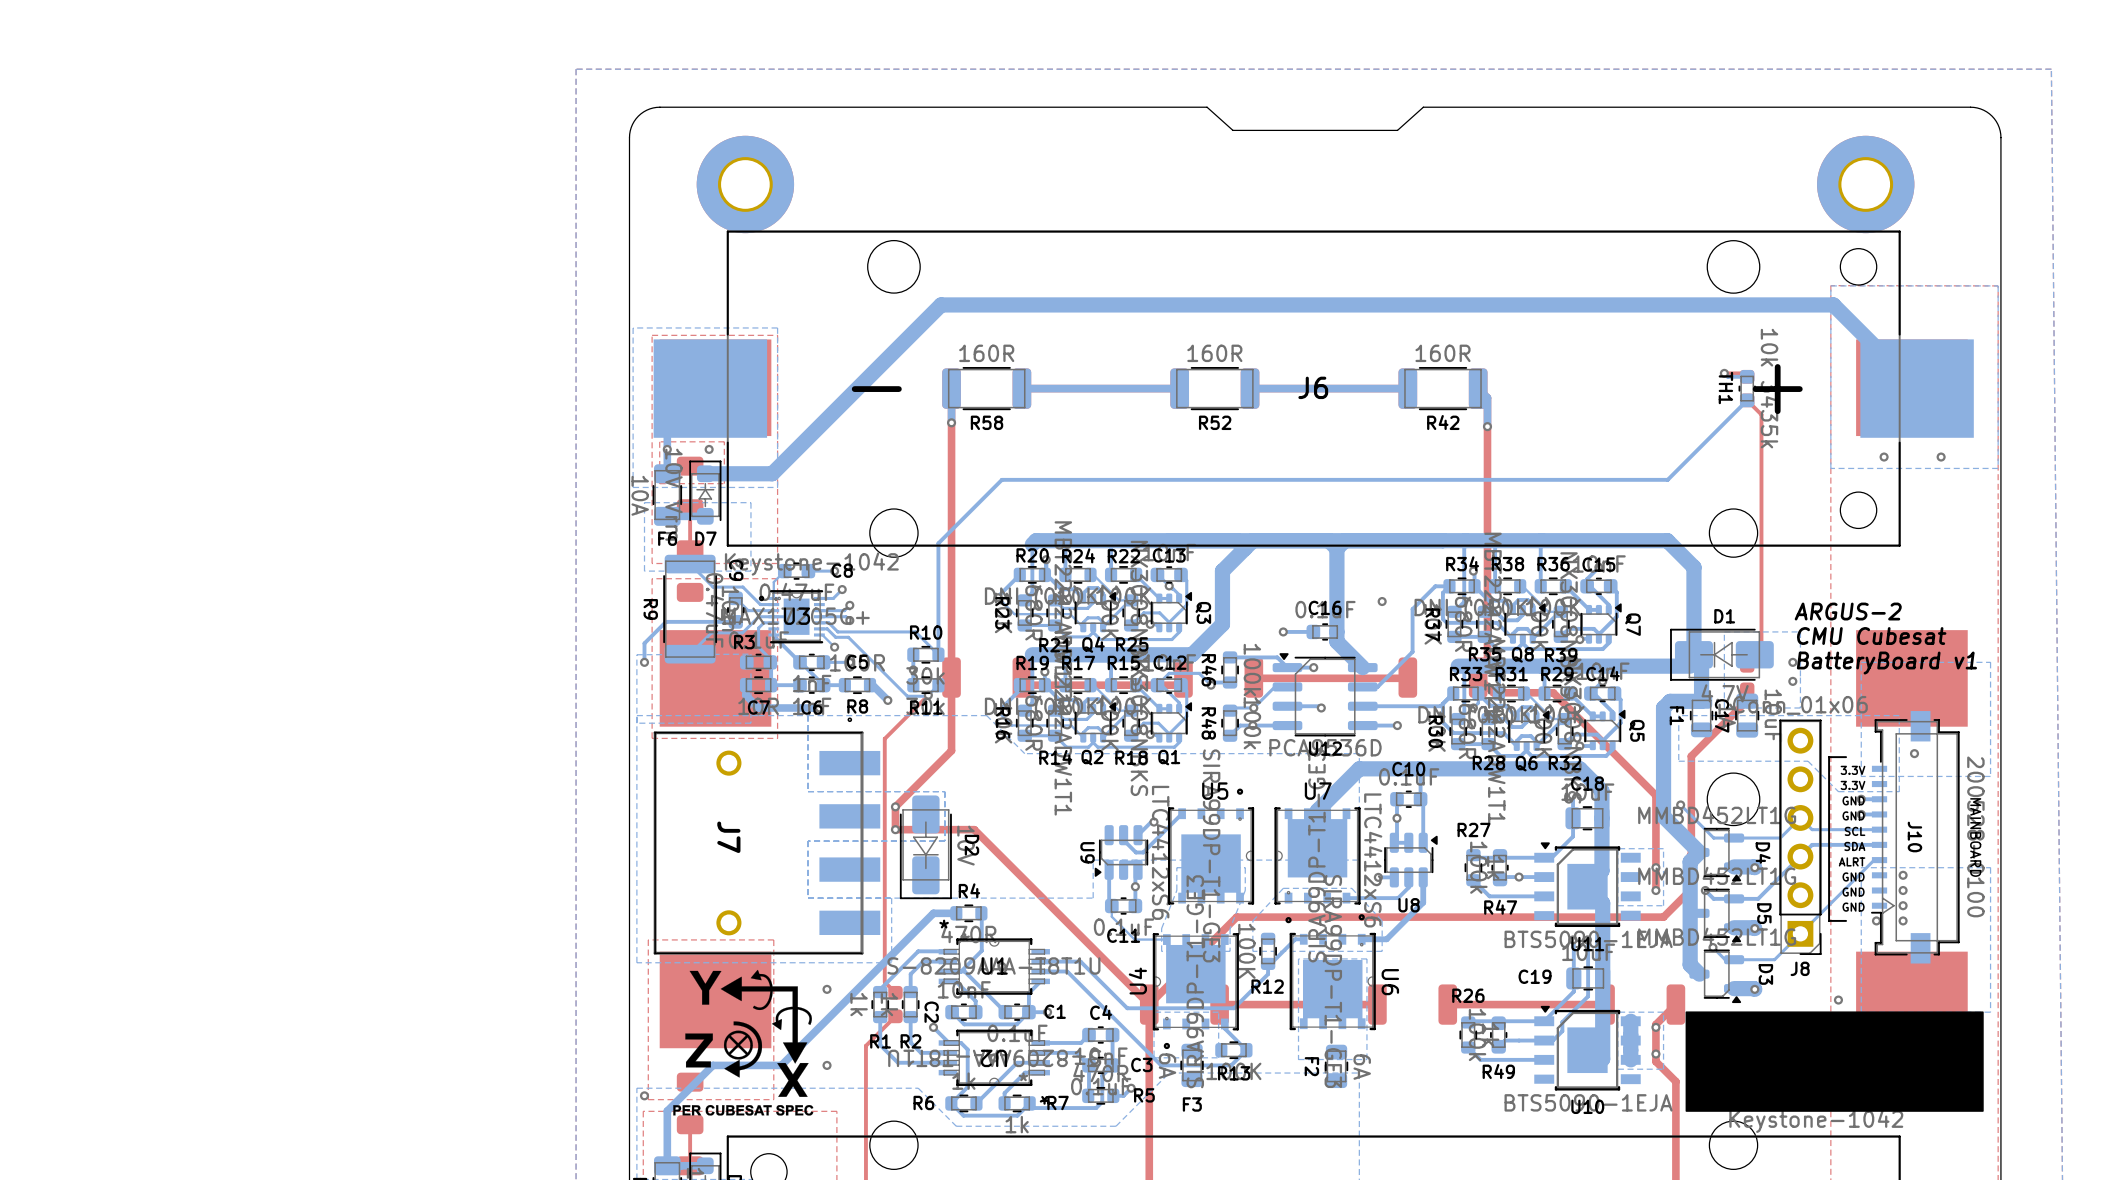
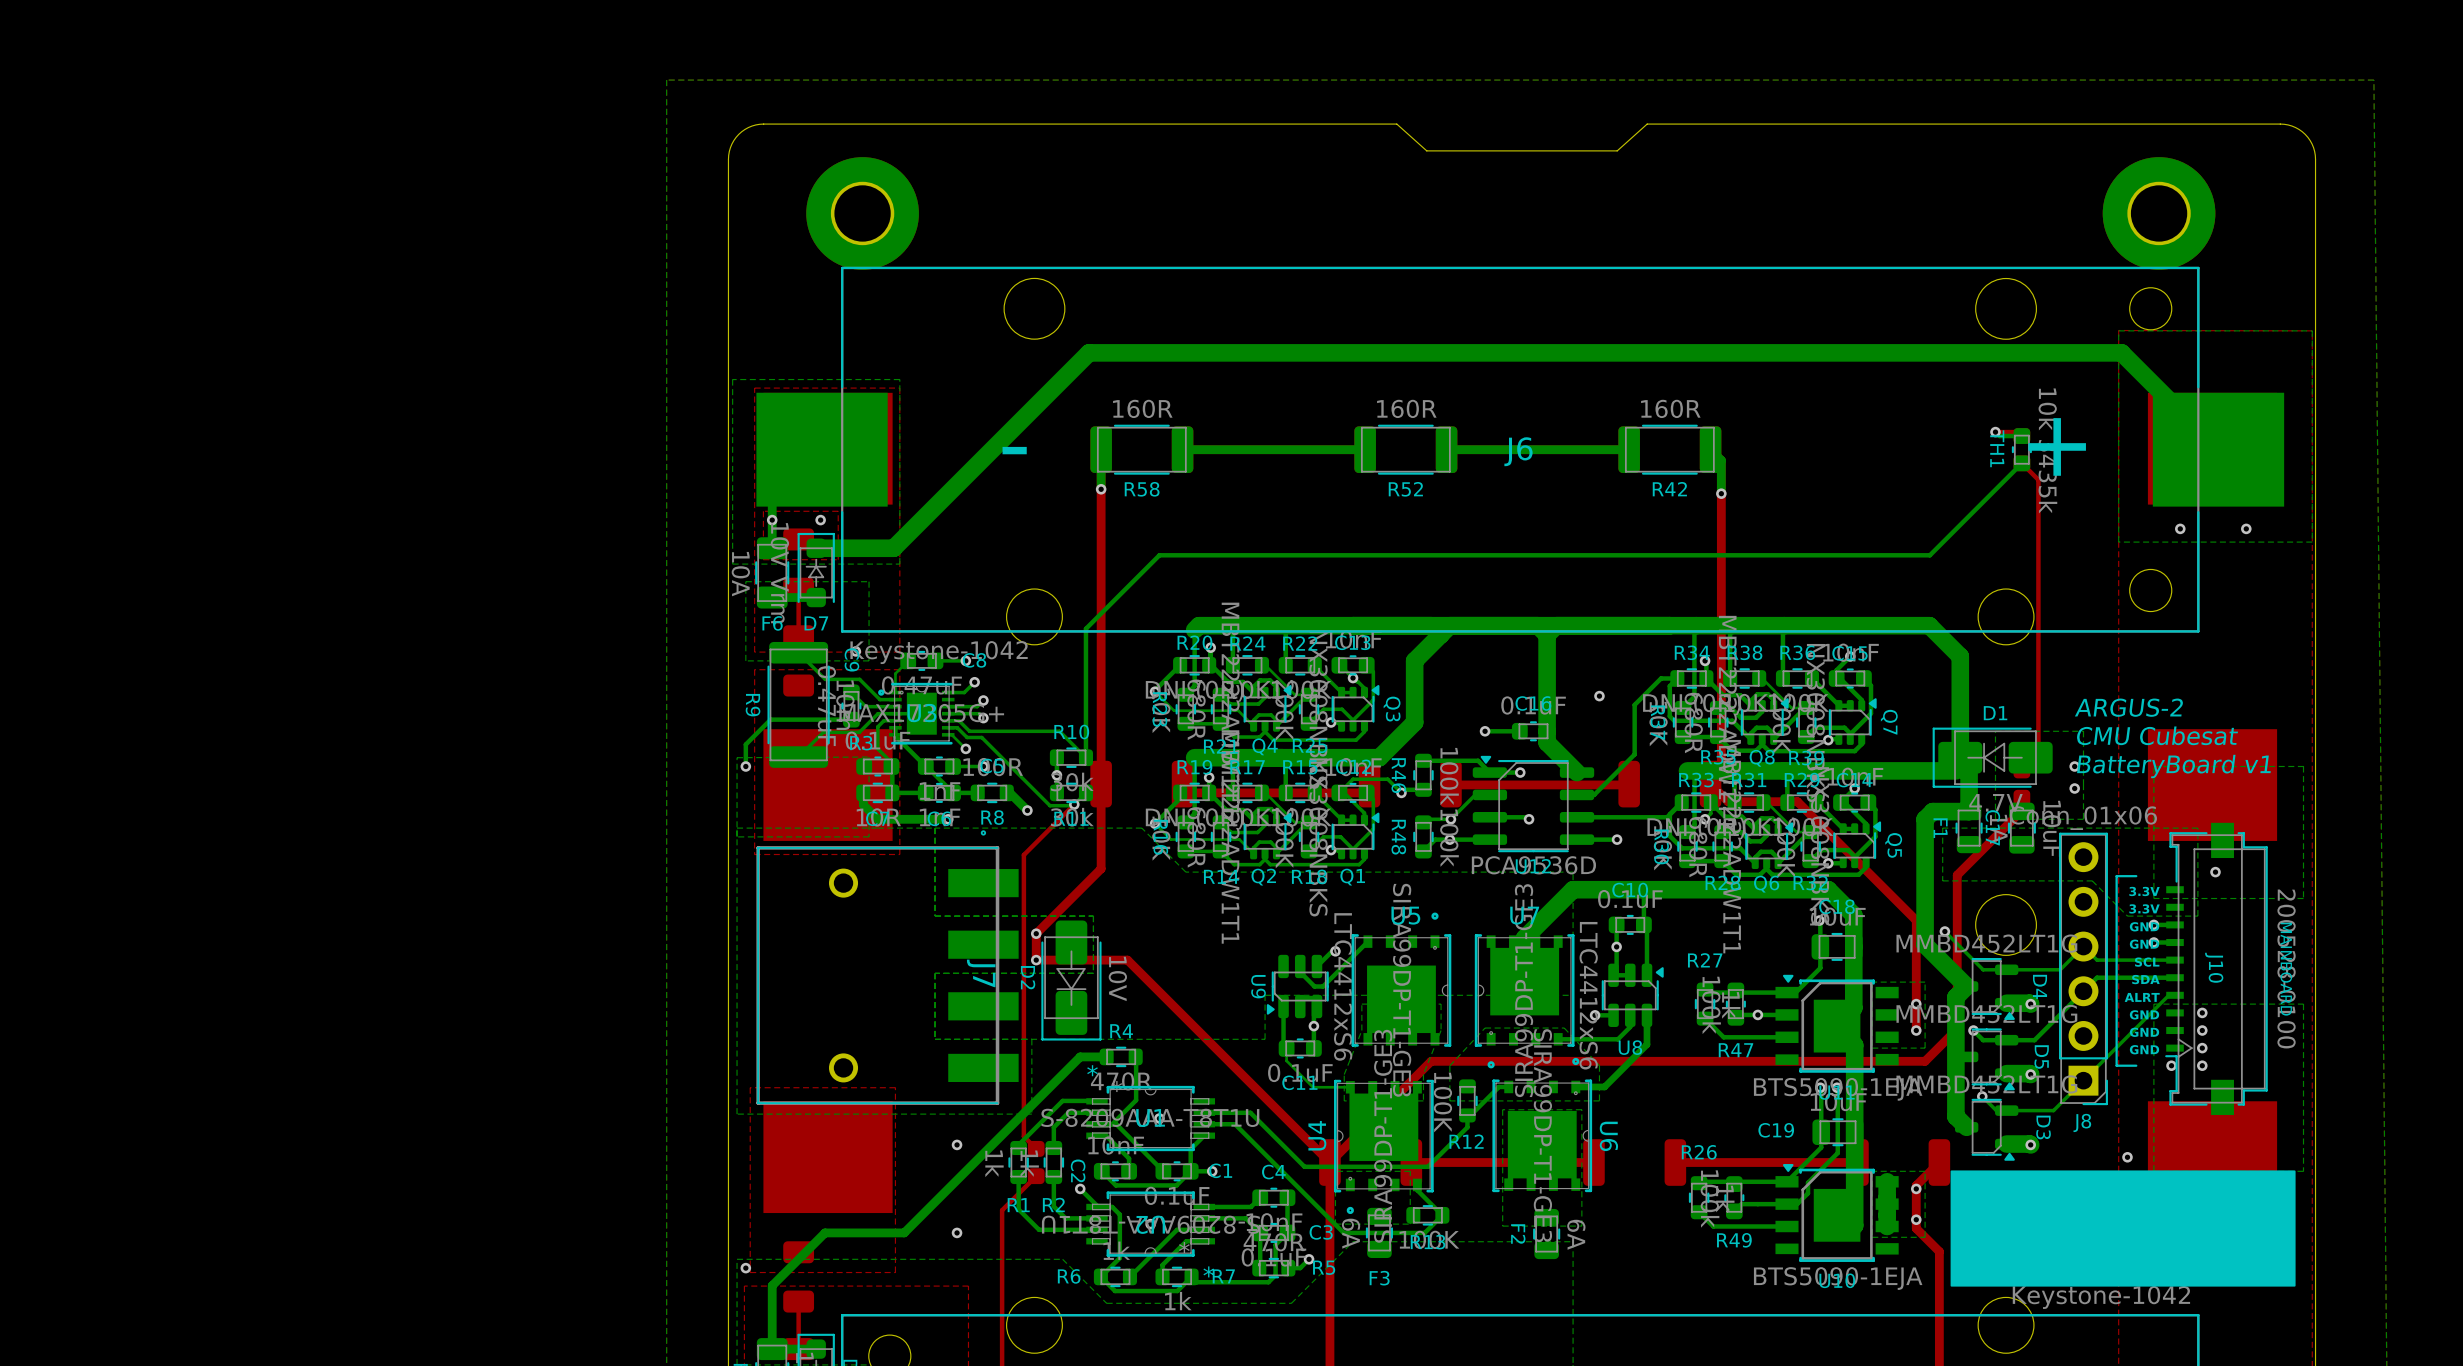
J7 name position: J7 (728, 837) -> J7 (981, 973)
D2 name position: D2 (971, 845) -> D2 (1028, 977)
drawing: [673, 969, 814, 1116] -> none

